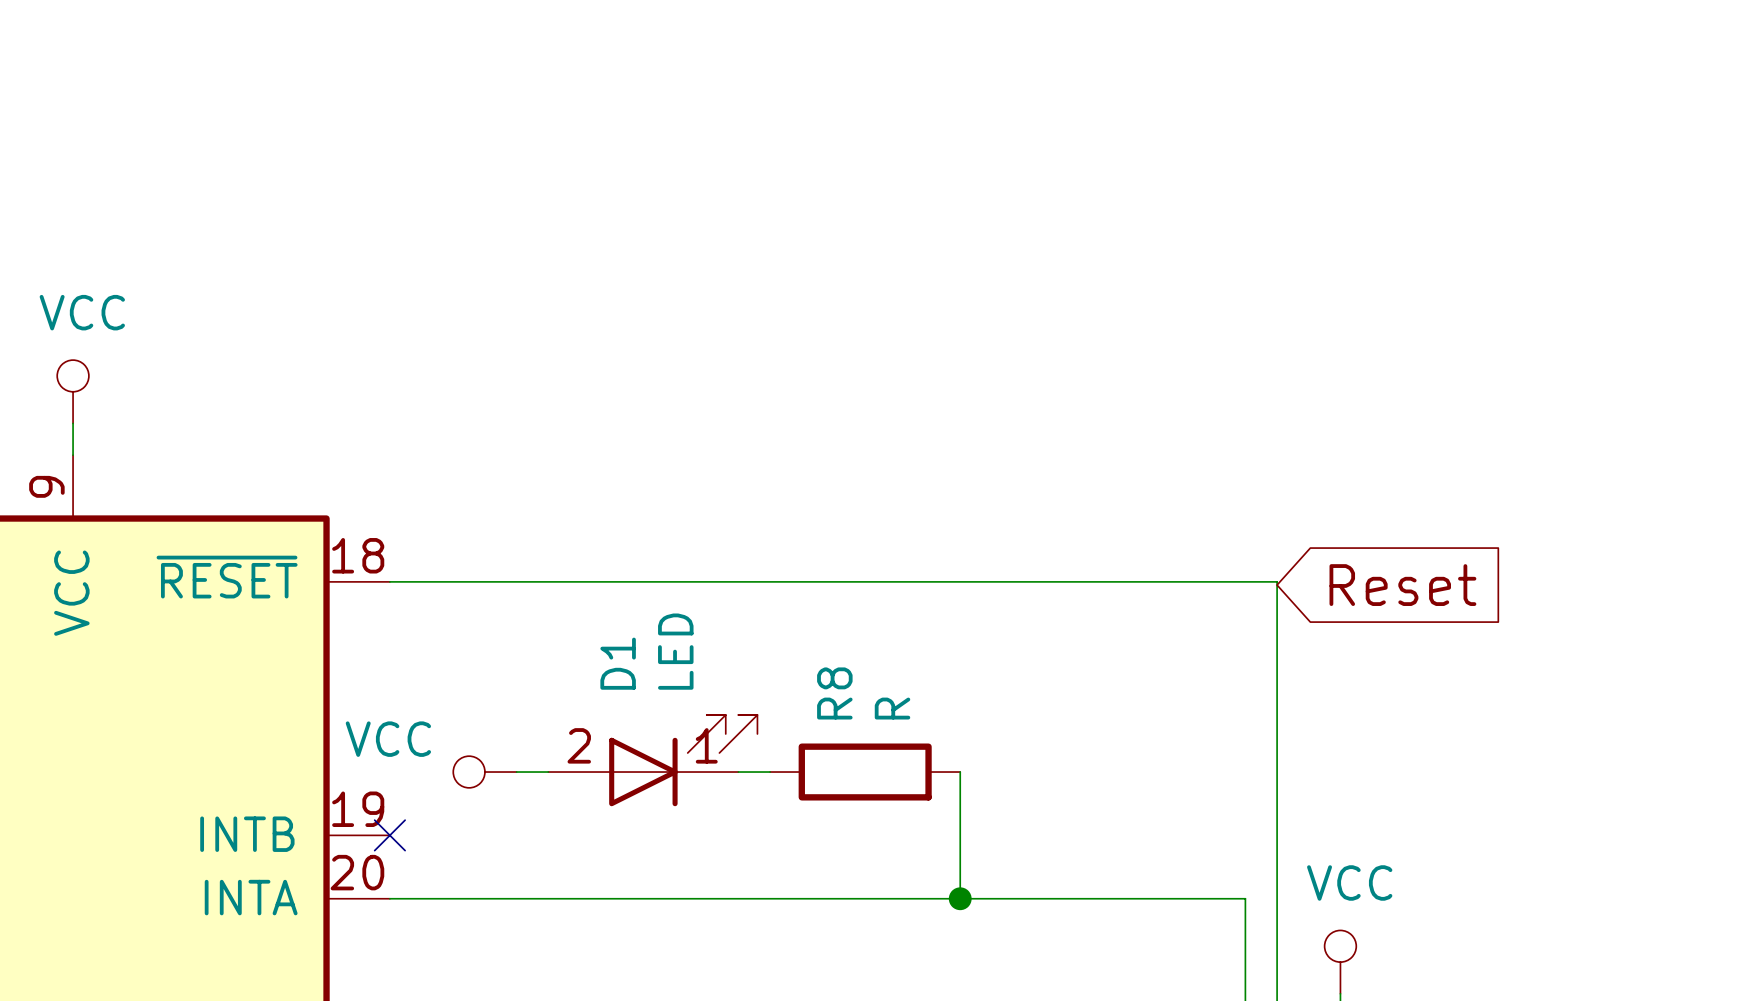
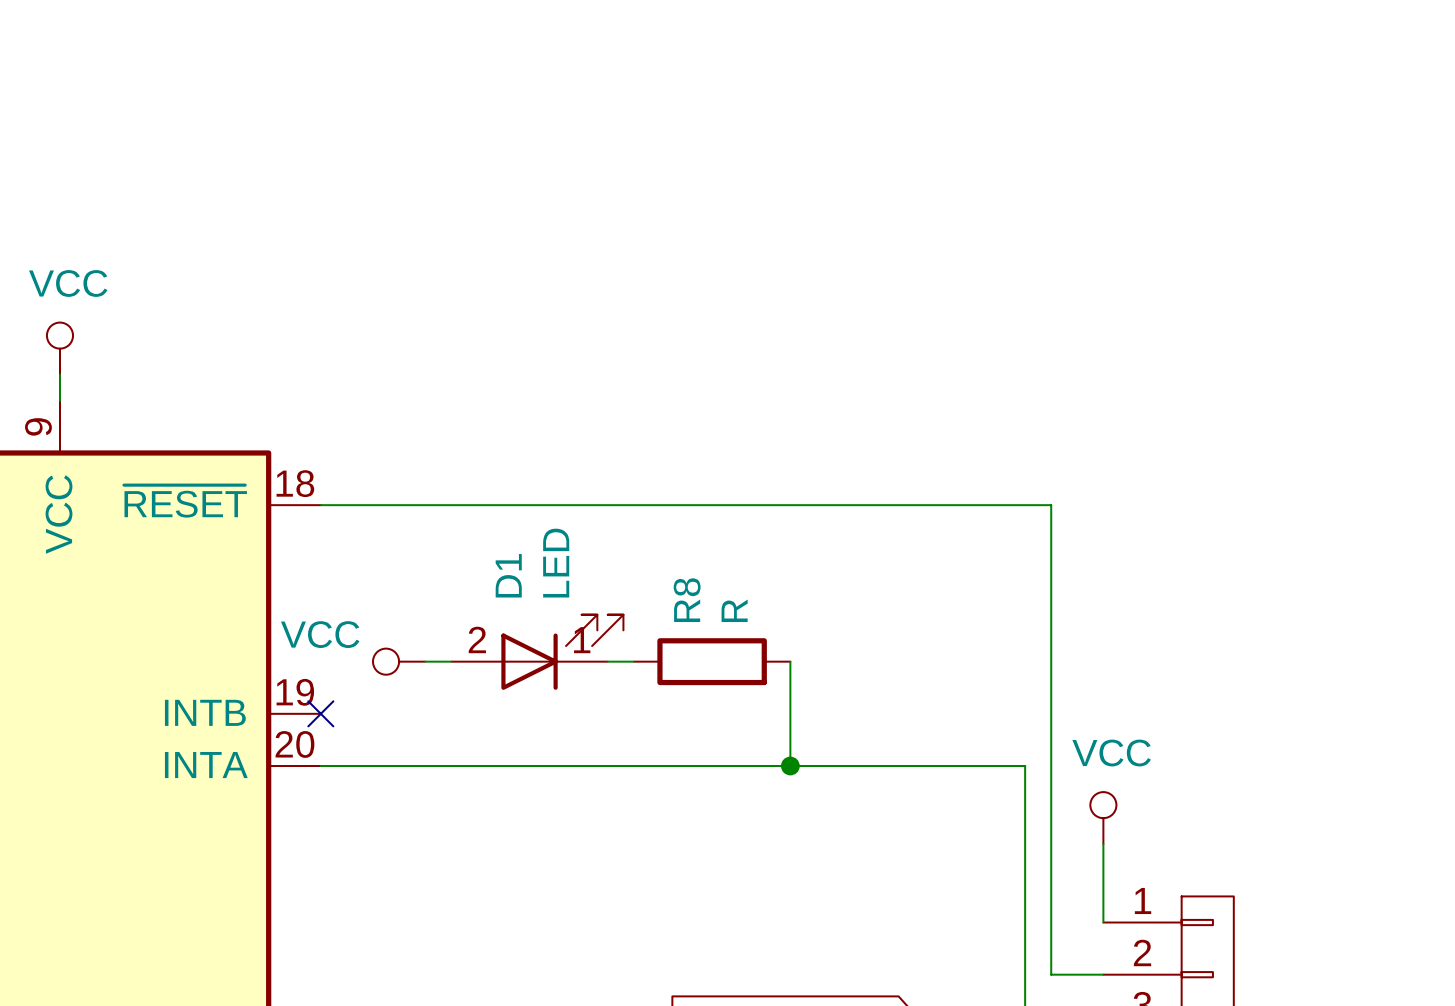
global label: Reset (1402, 585) -> none

